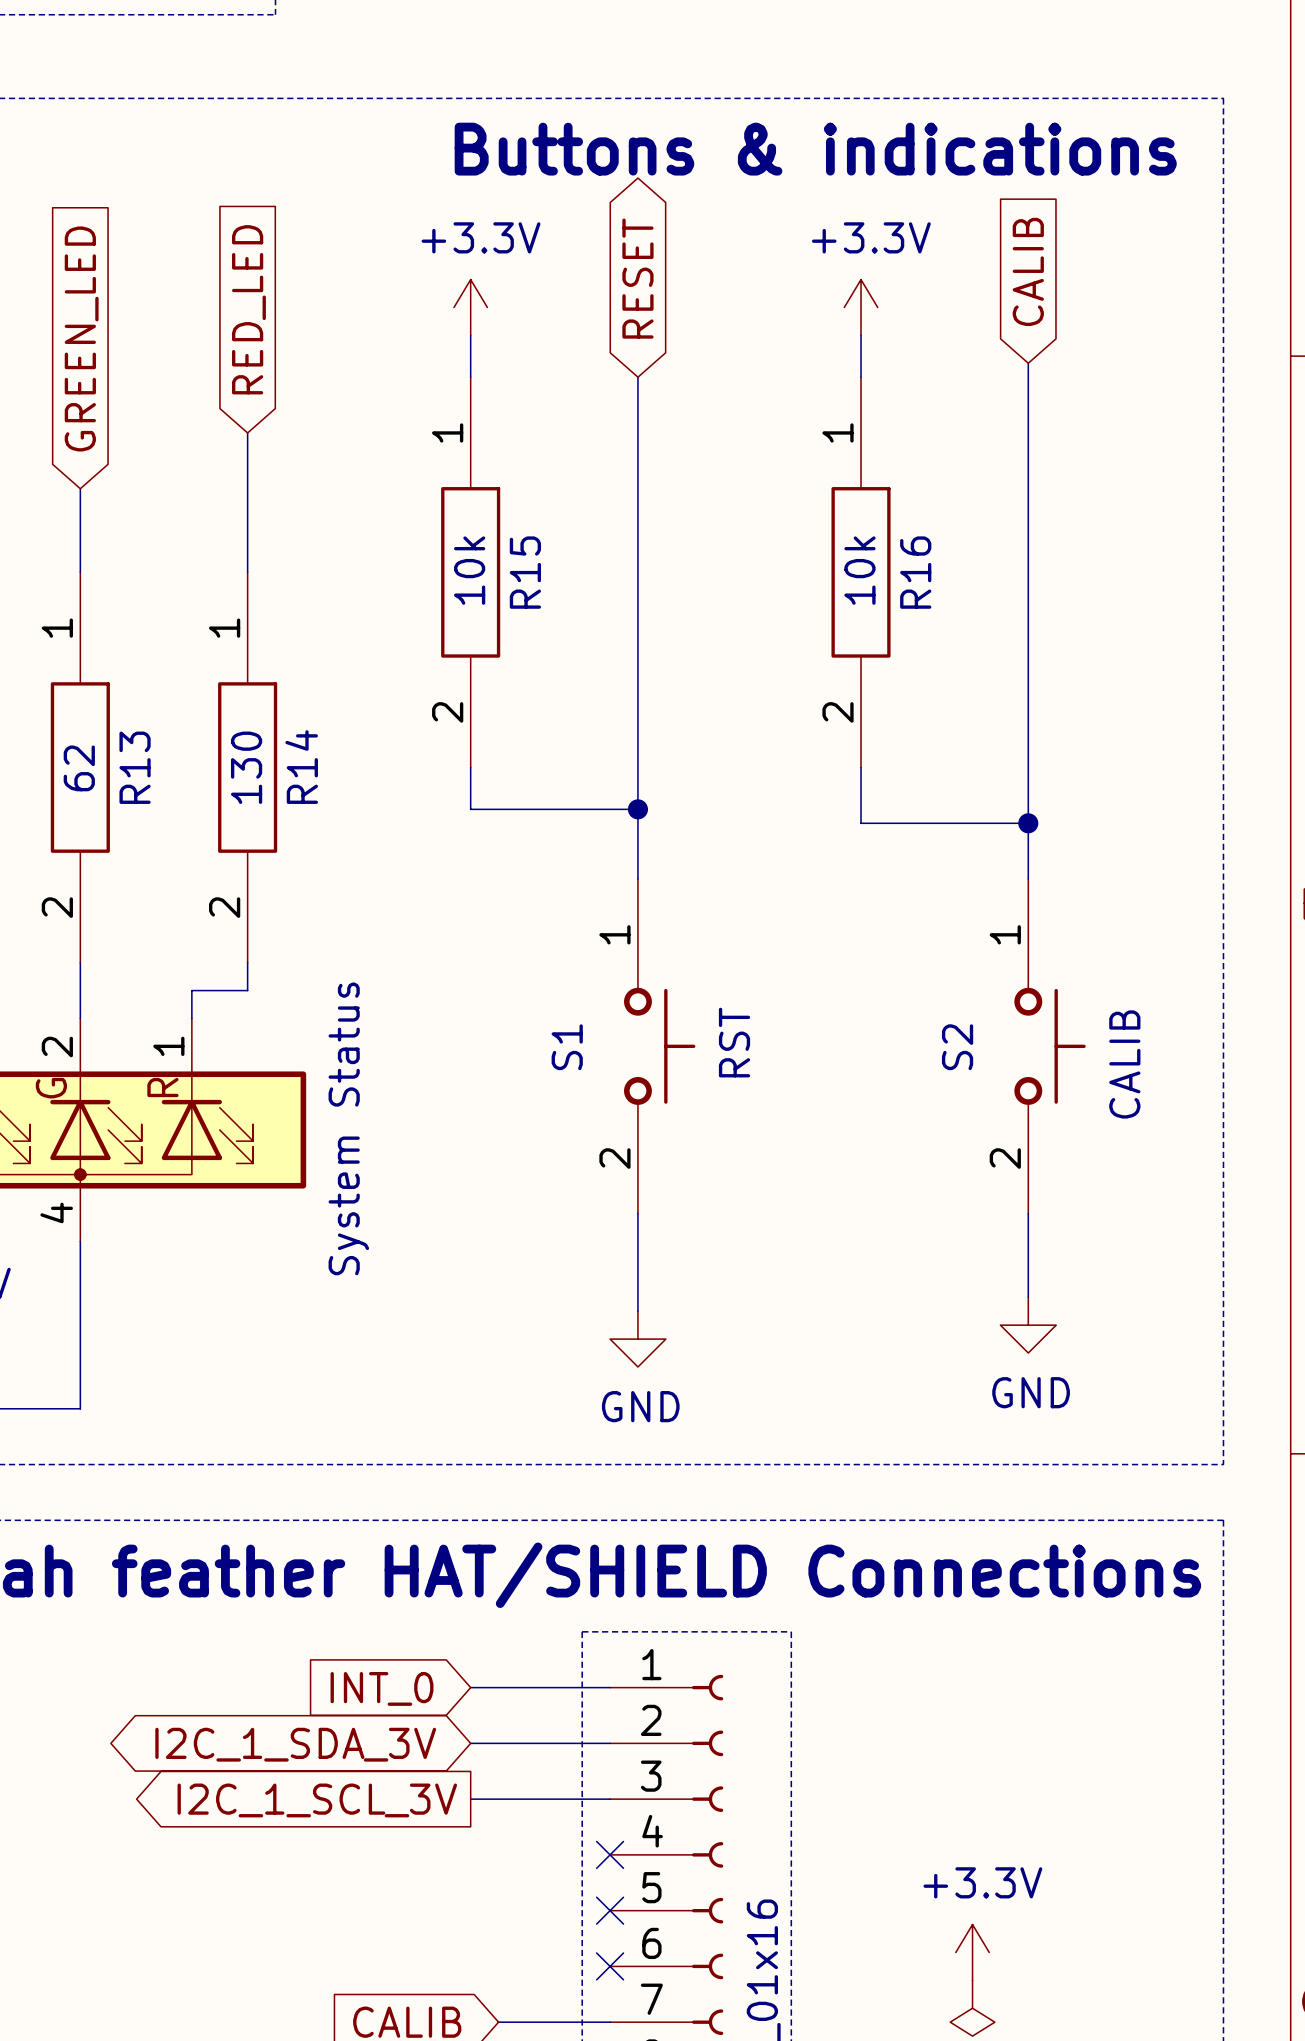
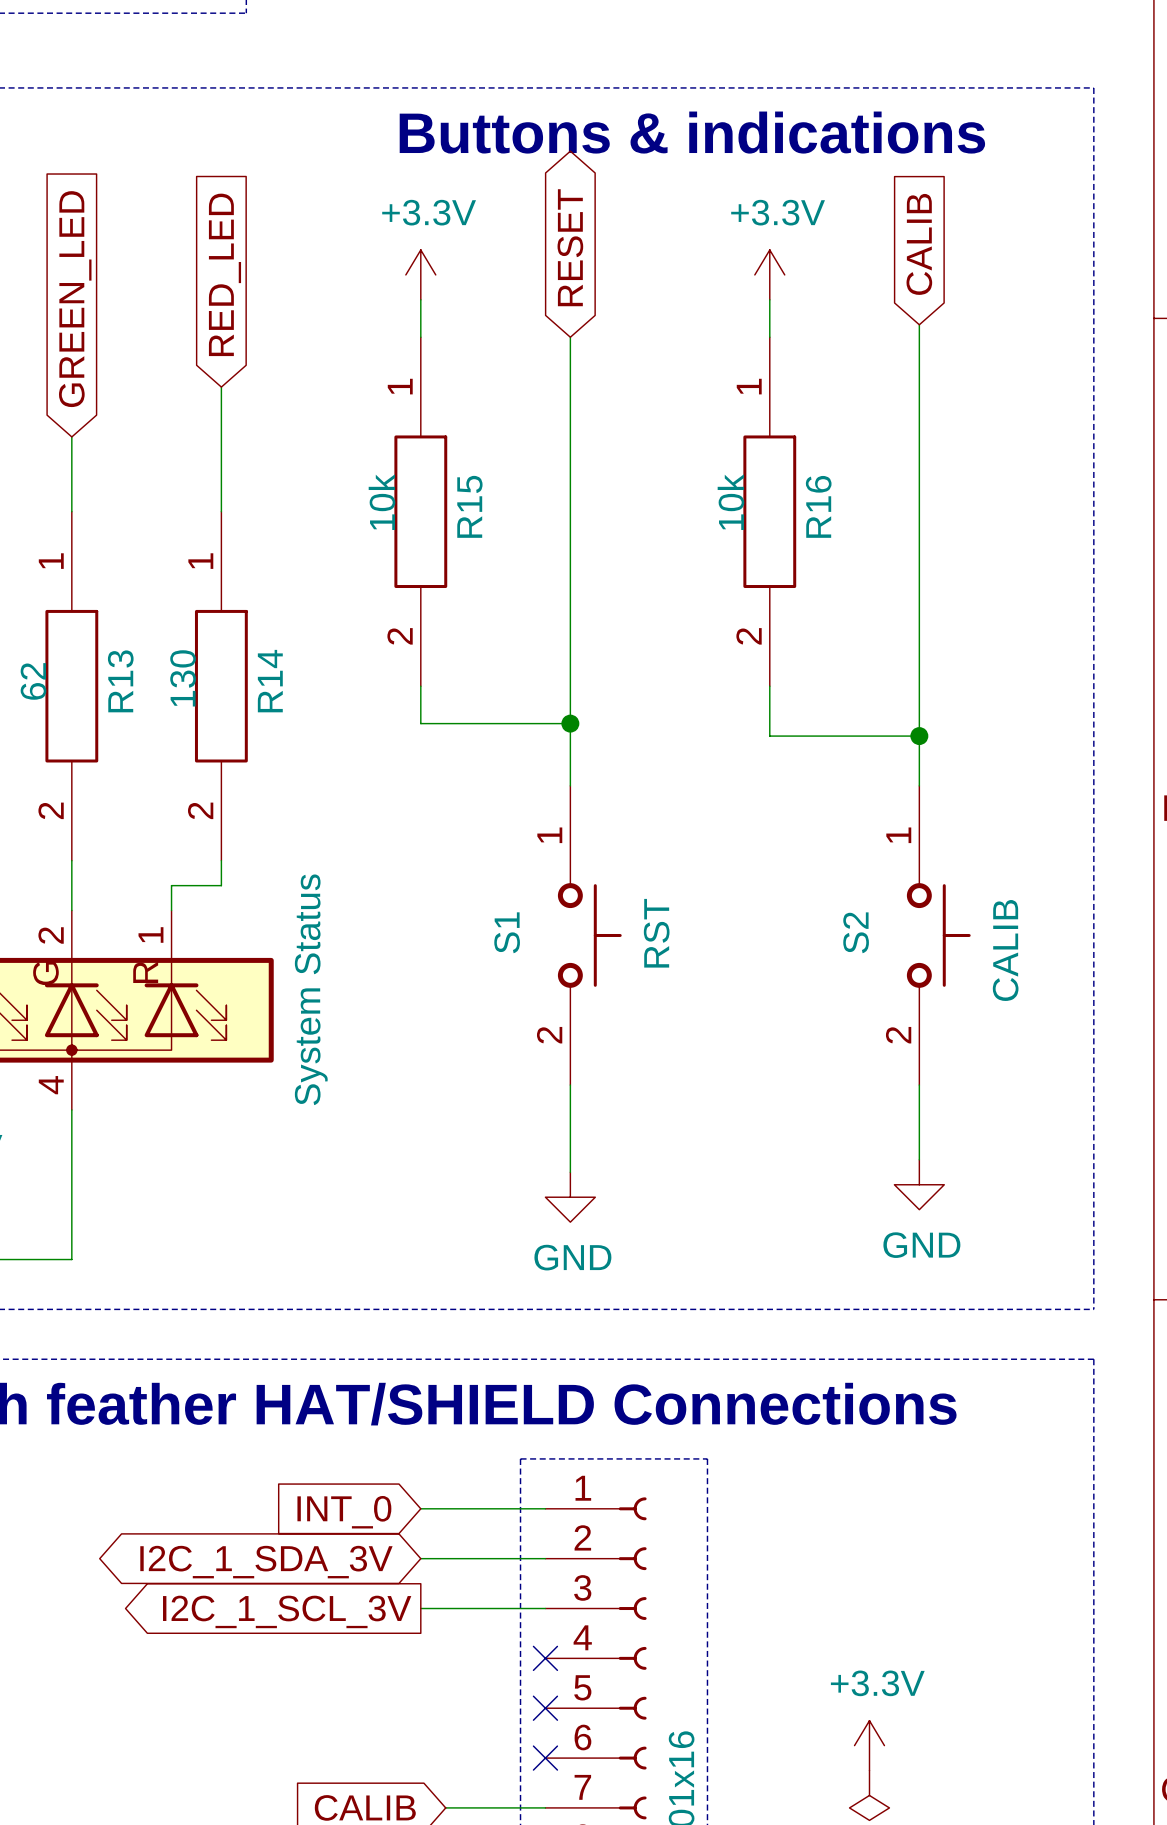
R15 value position: 10k (469, 570) -> 10k (382, 502)
R16 value position: 10k (859, 570) -> 10k (730, 502)
R14 value position: 130 (246, 767) -> 130 (183, 678)
R13 value position: 62 (79, 768) -> 62 (33, 681)

